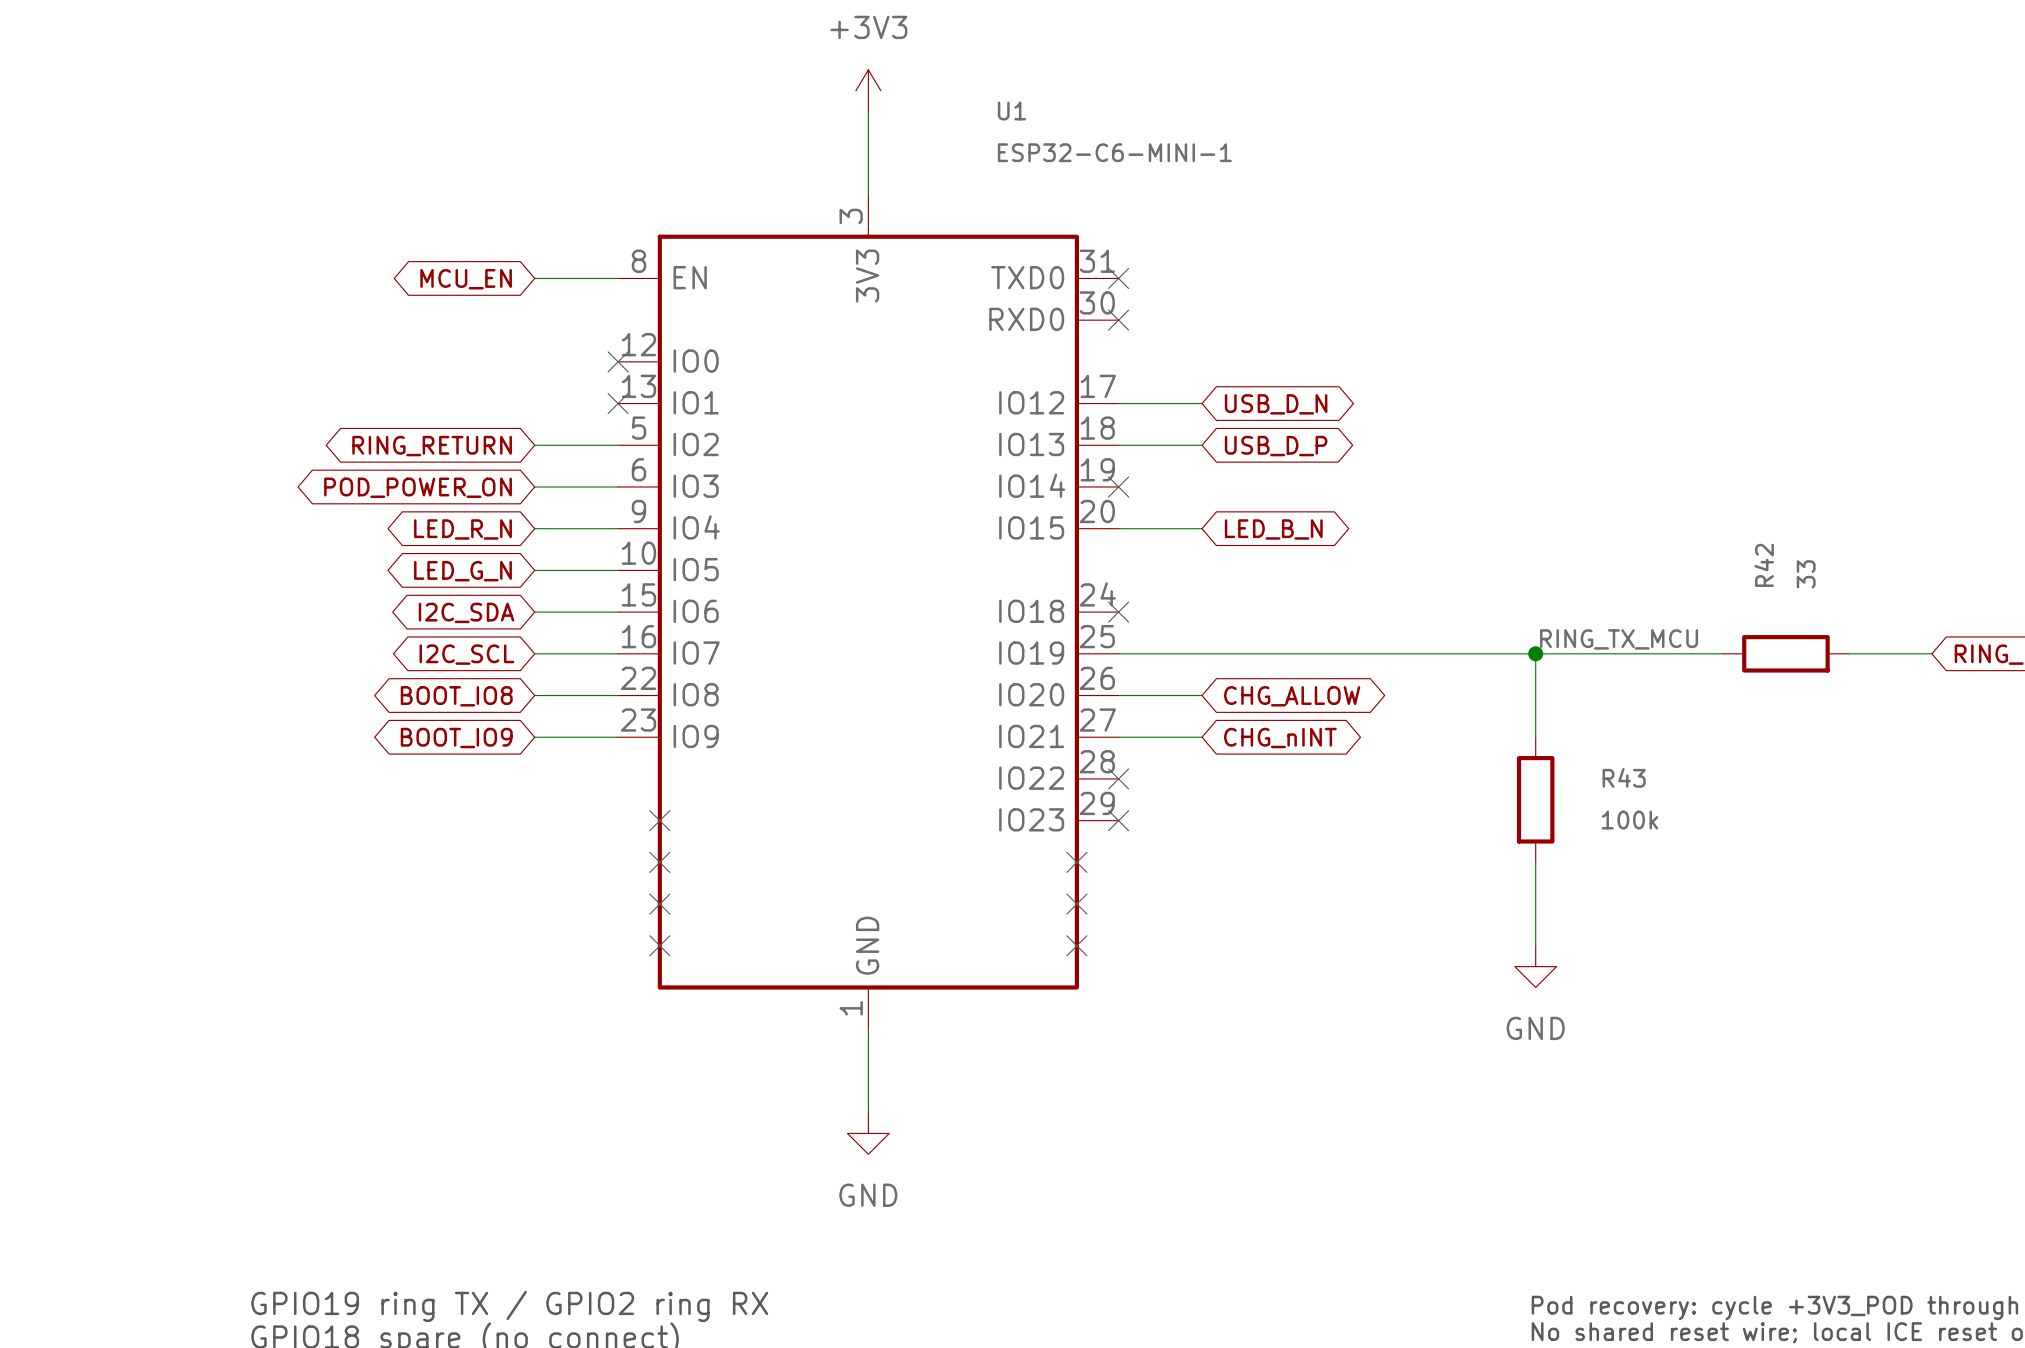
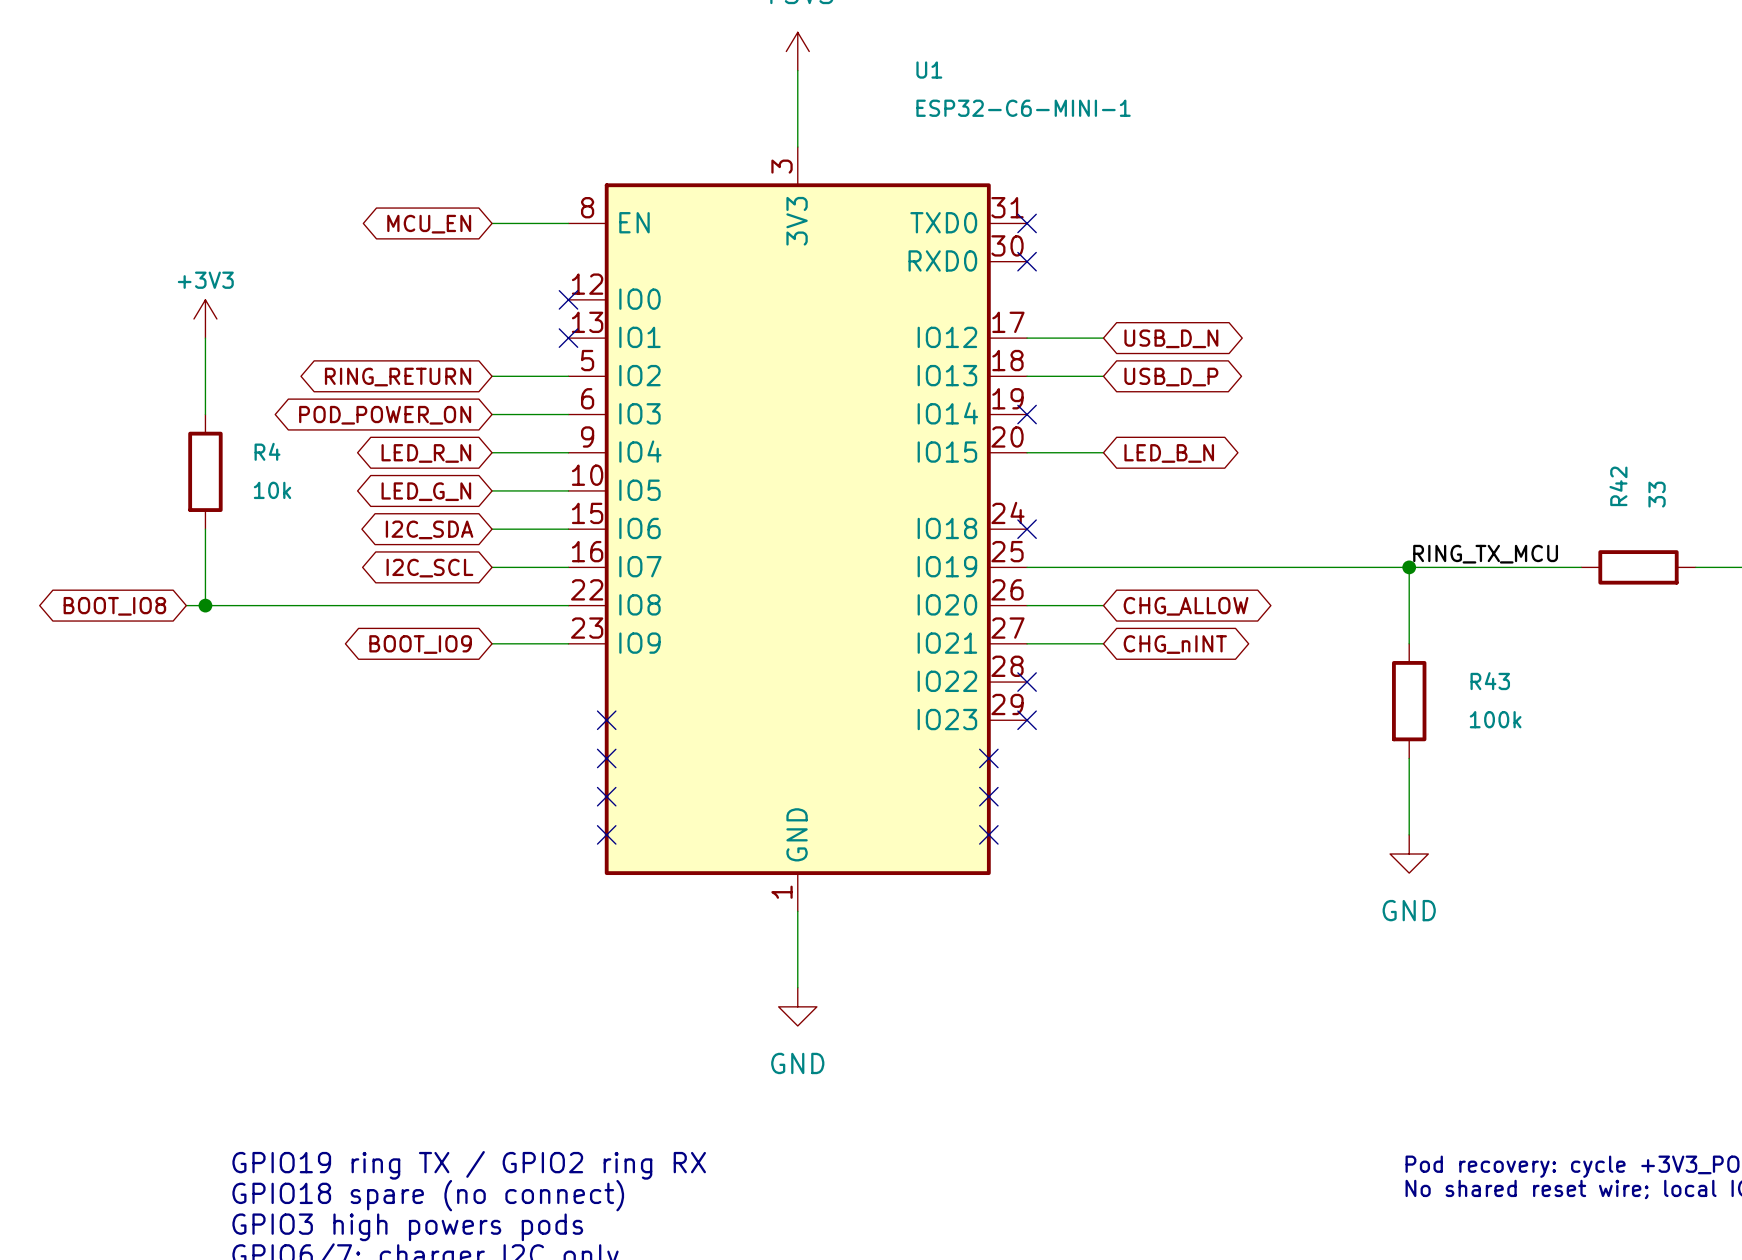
power symbol: none -> +3V3 (205, 318)
wire: none -> (205, 338) (205, 414)
R4: none -> 10k (205, 471)
wire: none -> (205, 529) (205, 605)
wire: none -> (186, 605) (492, 605)
junction: none -> (205, 605)
global label position: BOOT_IO8 (456, 696) -> BOOT_IO8 (114, 606)

